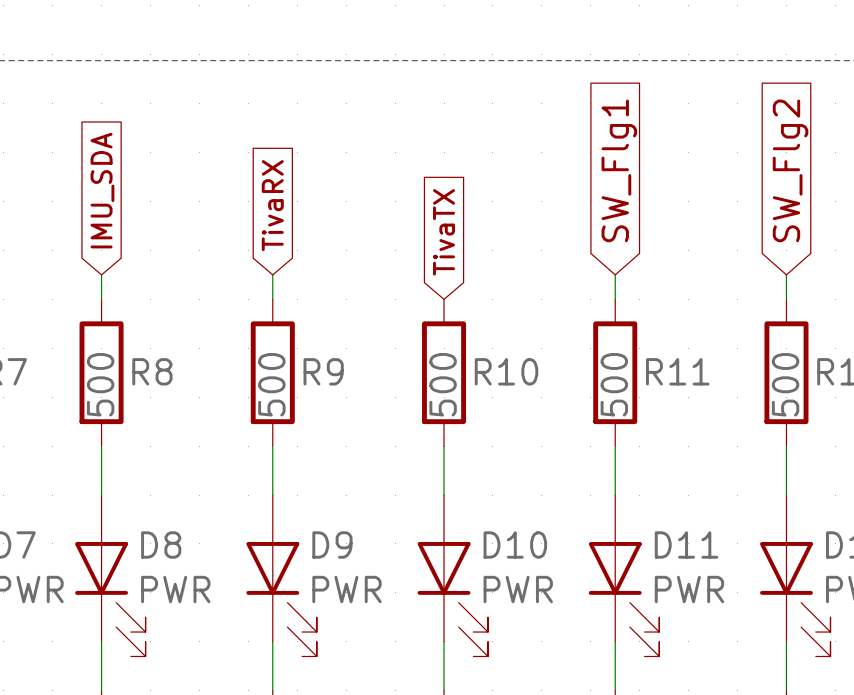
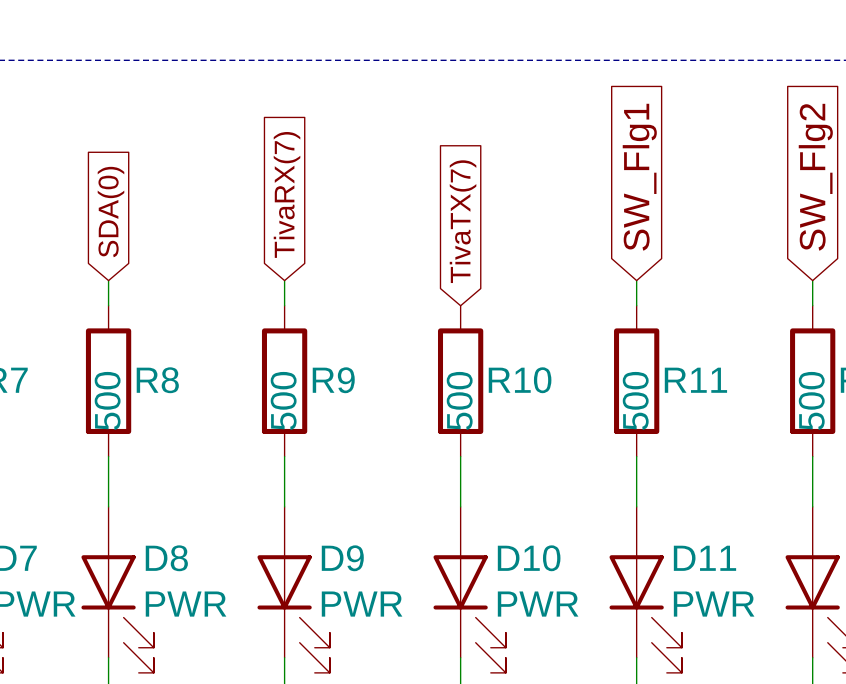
global label: IMU_SDA (102, 190) -> SDA(0) (110, 212)
global label: TivaRX (272, 205) -> TivaRX(7) (287, 194)
global label: TivaTX (444, 232) -> TivaTX(7) (463, 221)

